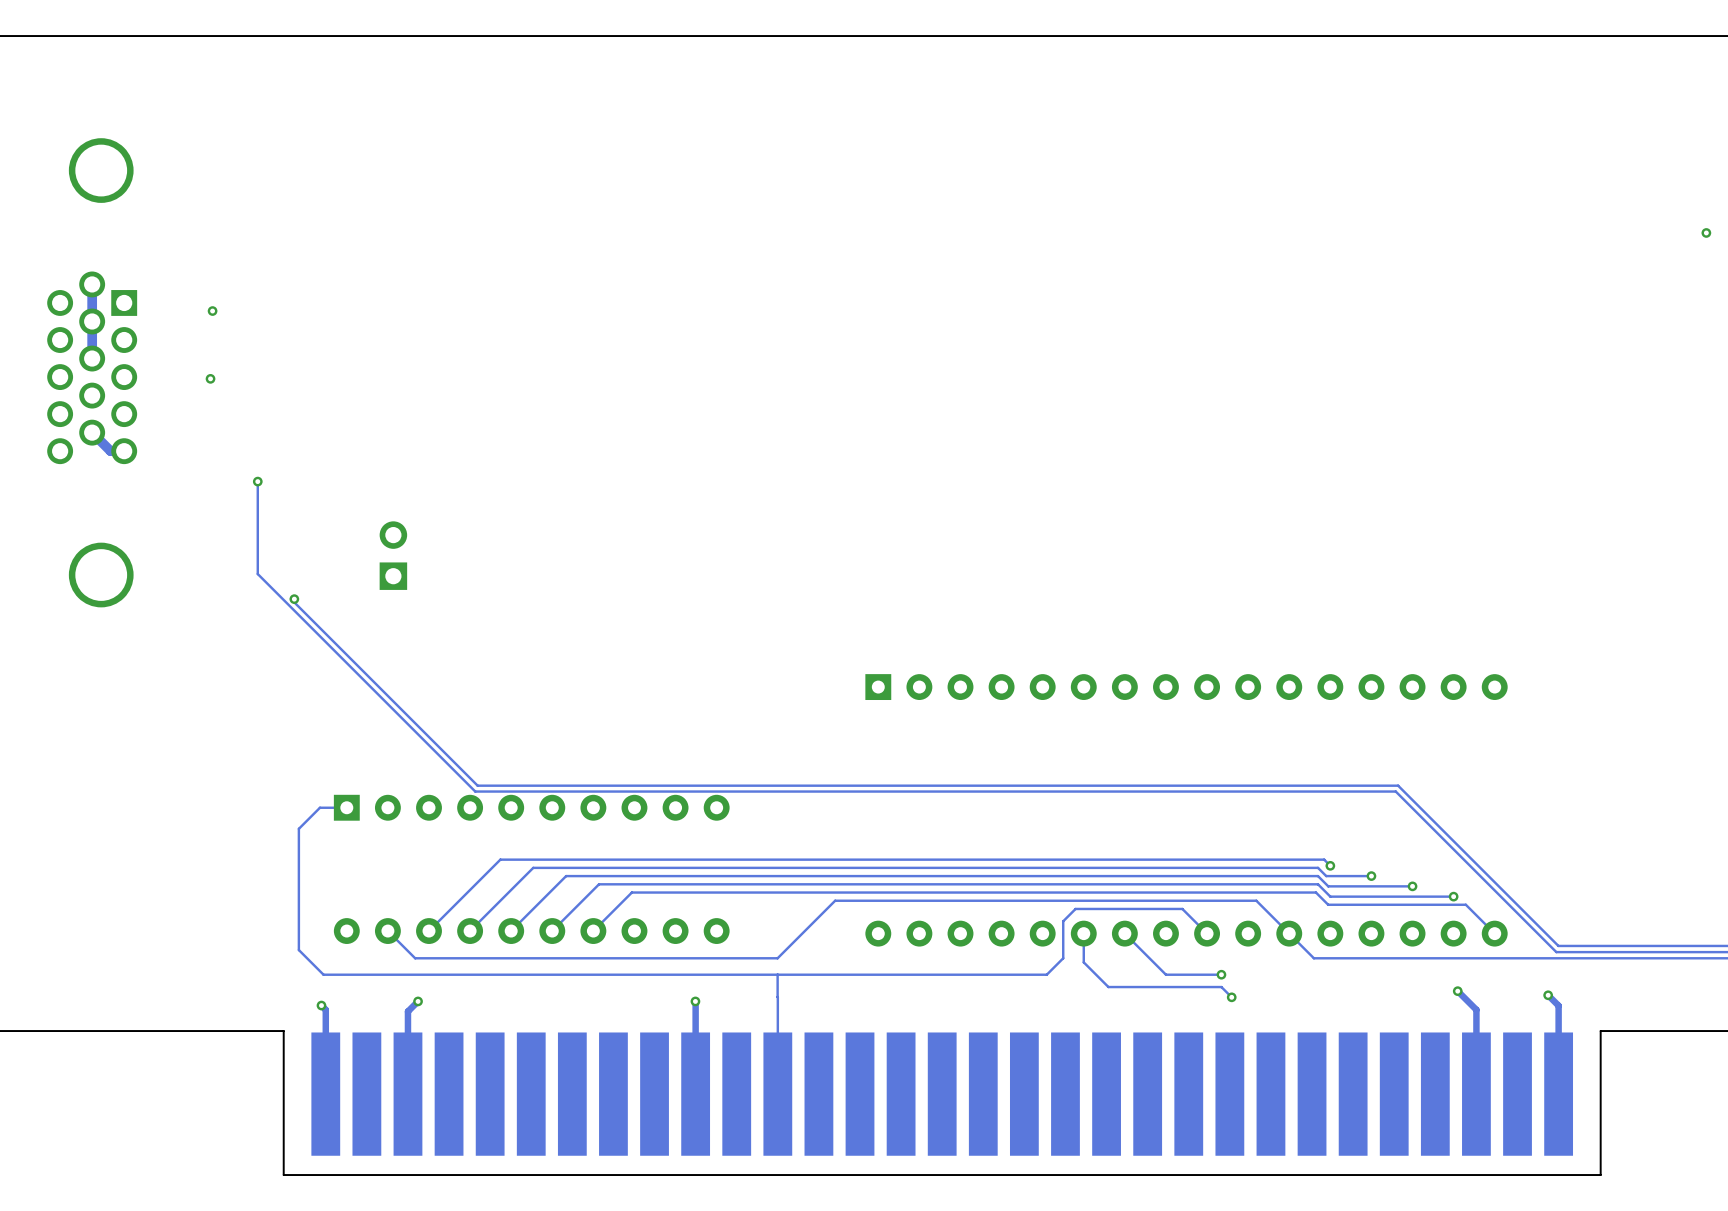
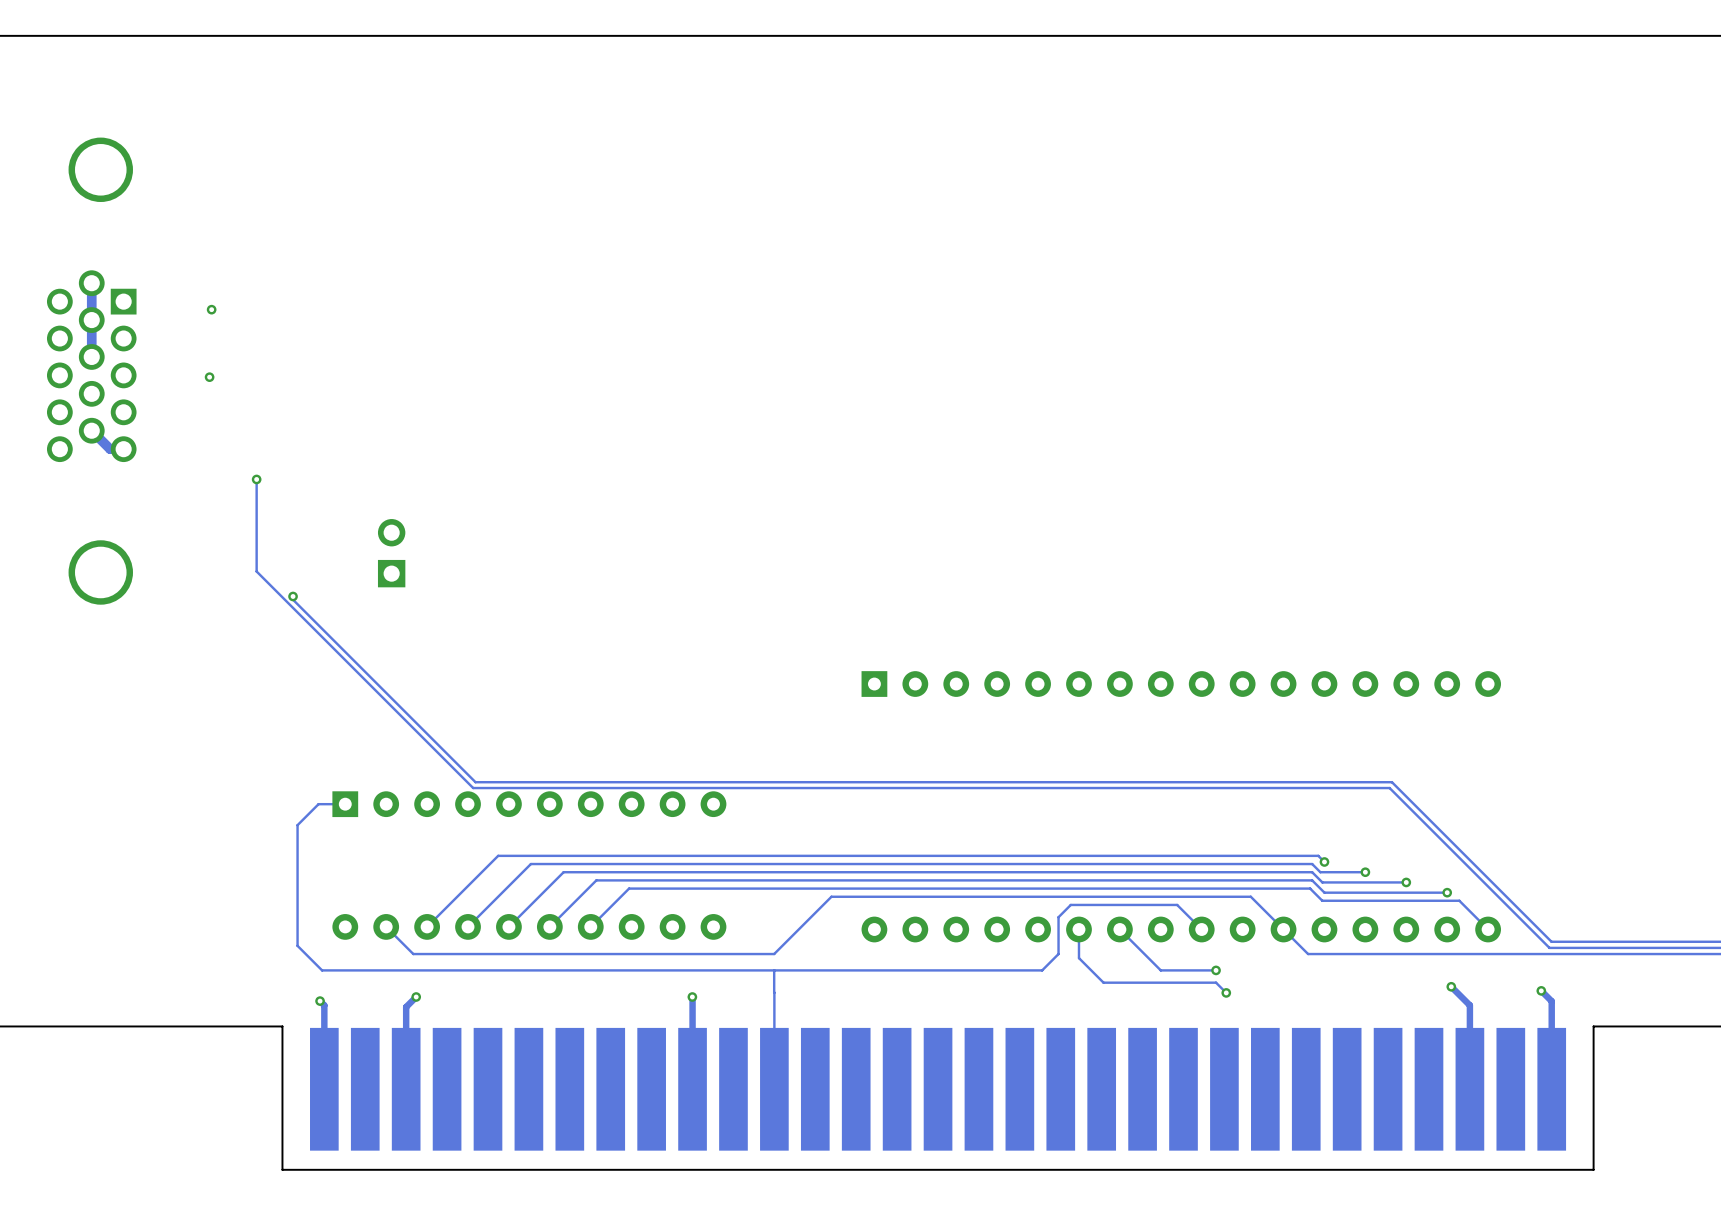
via: (1706, 232) -> none

